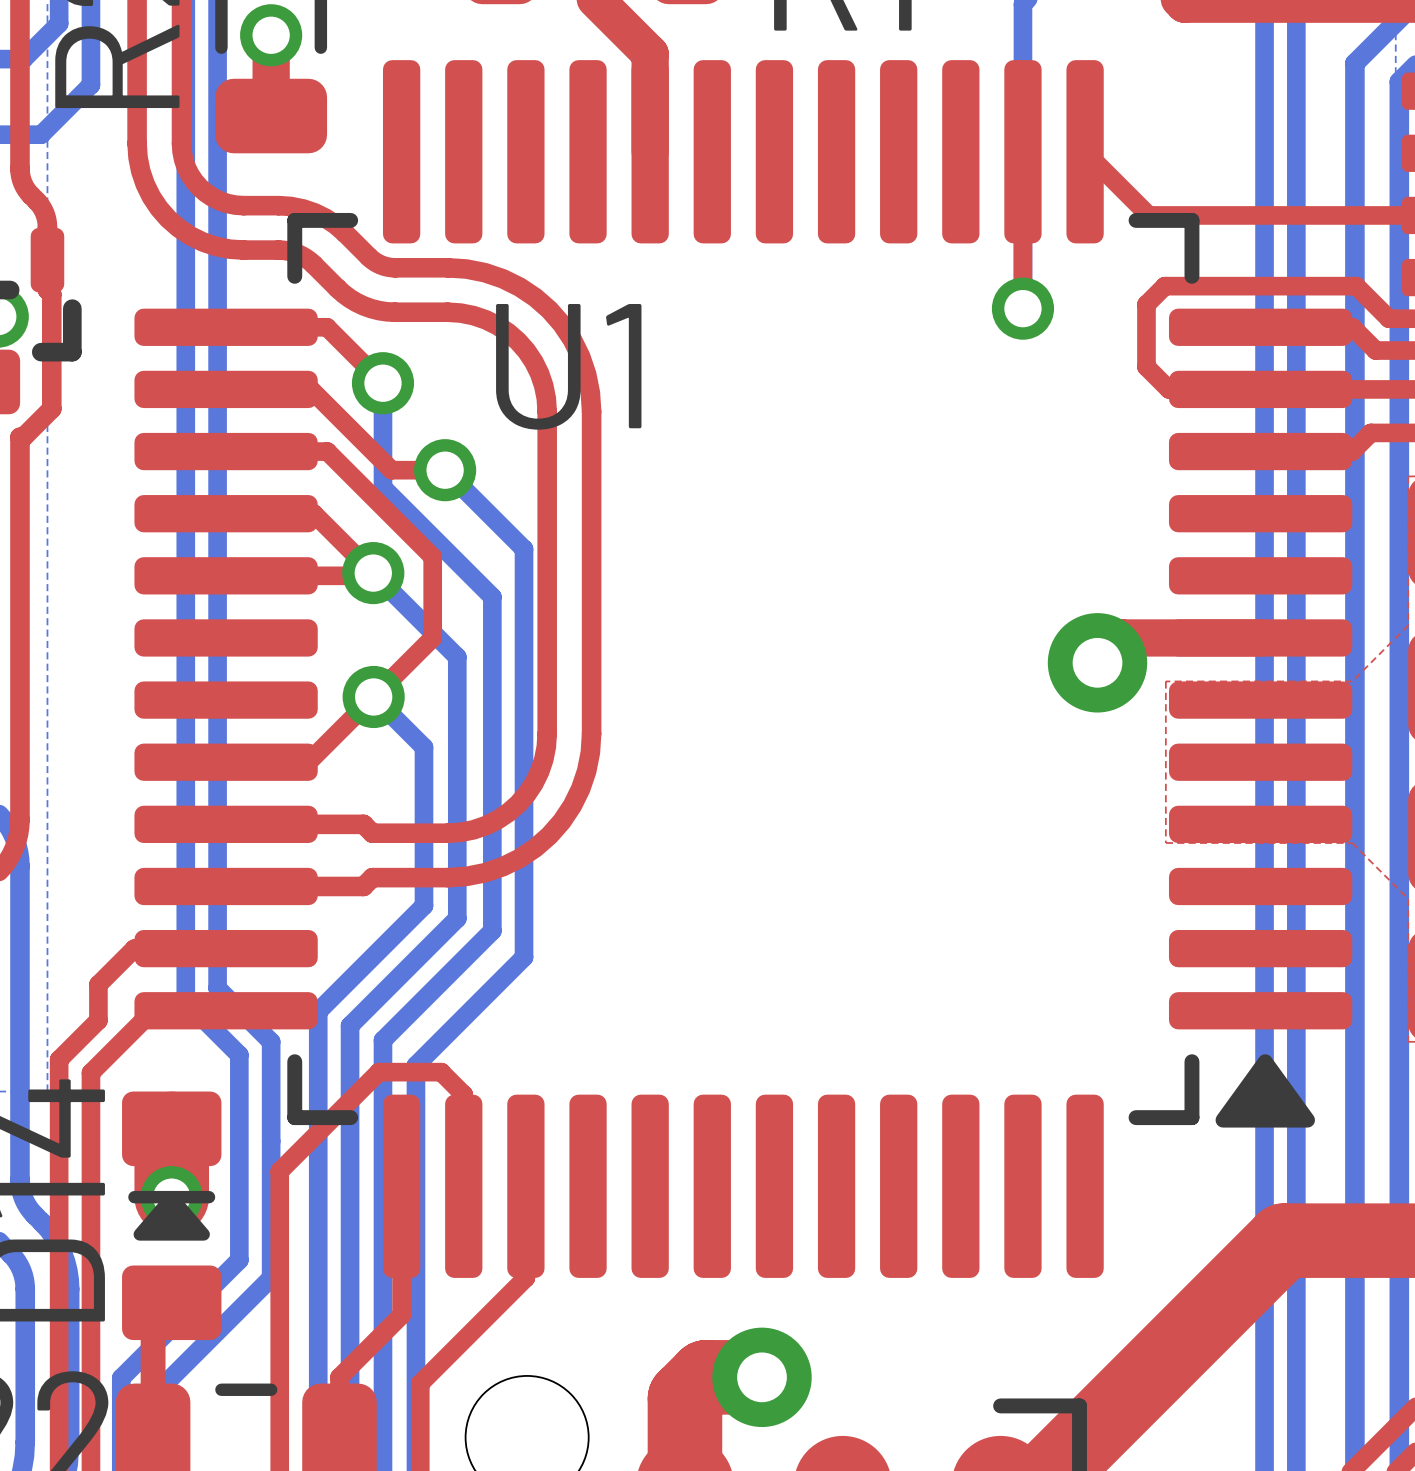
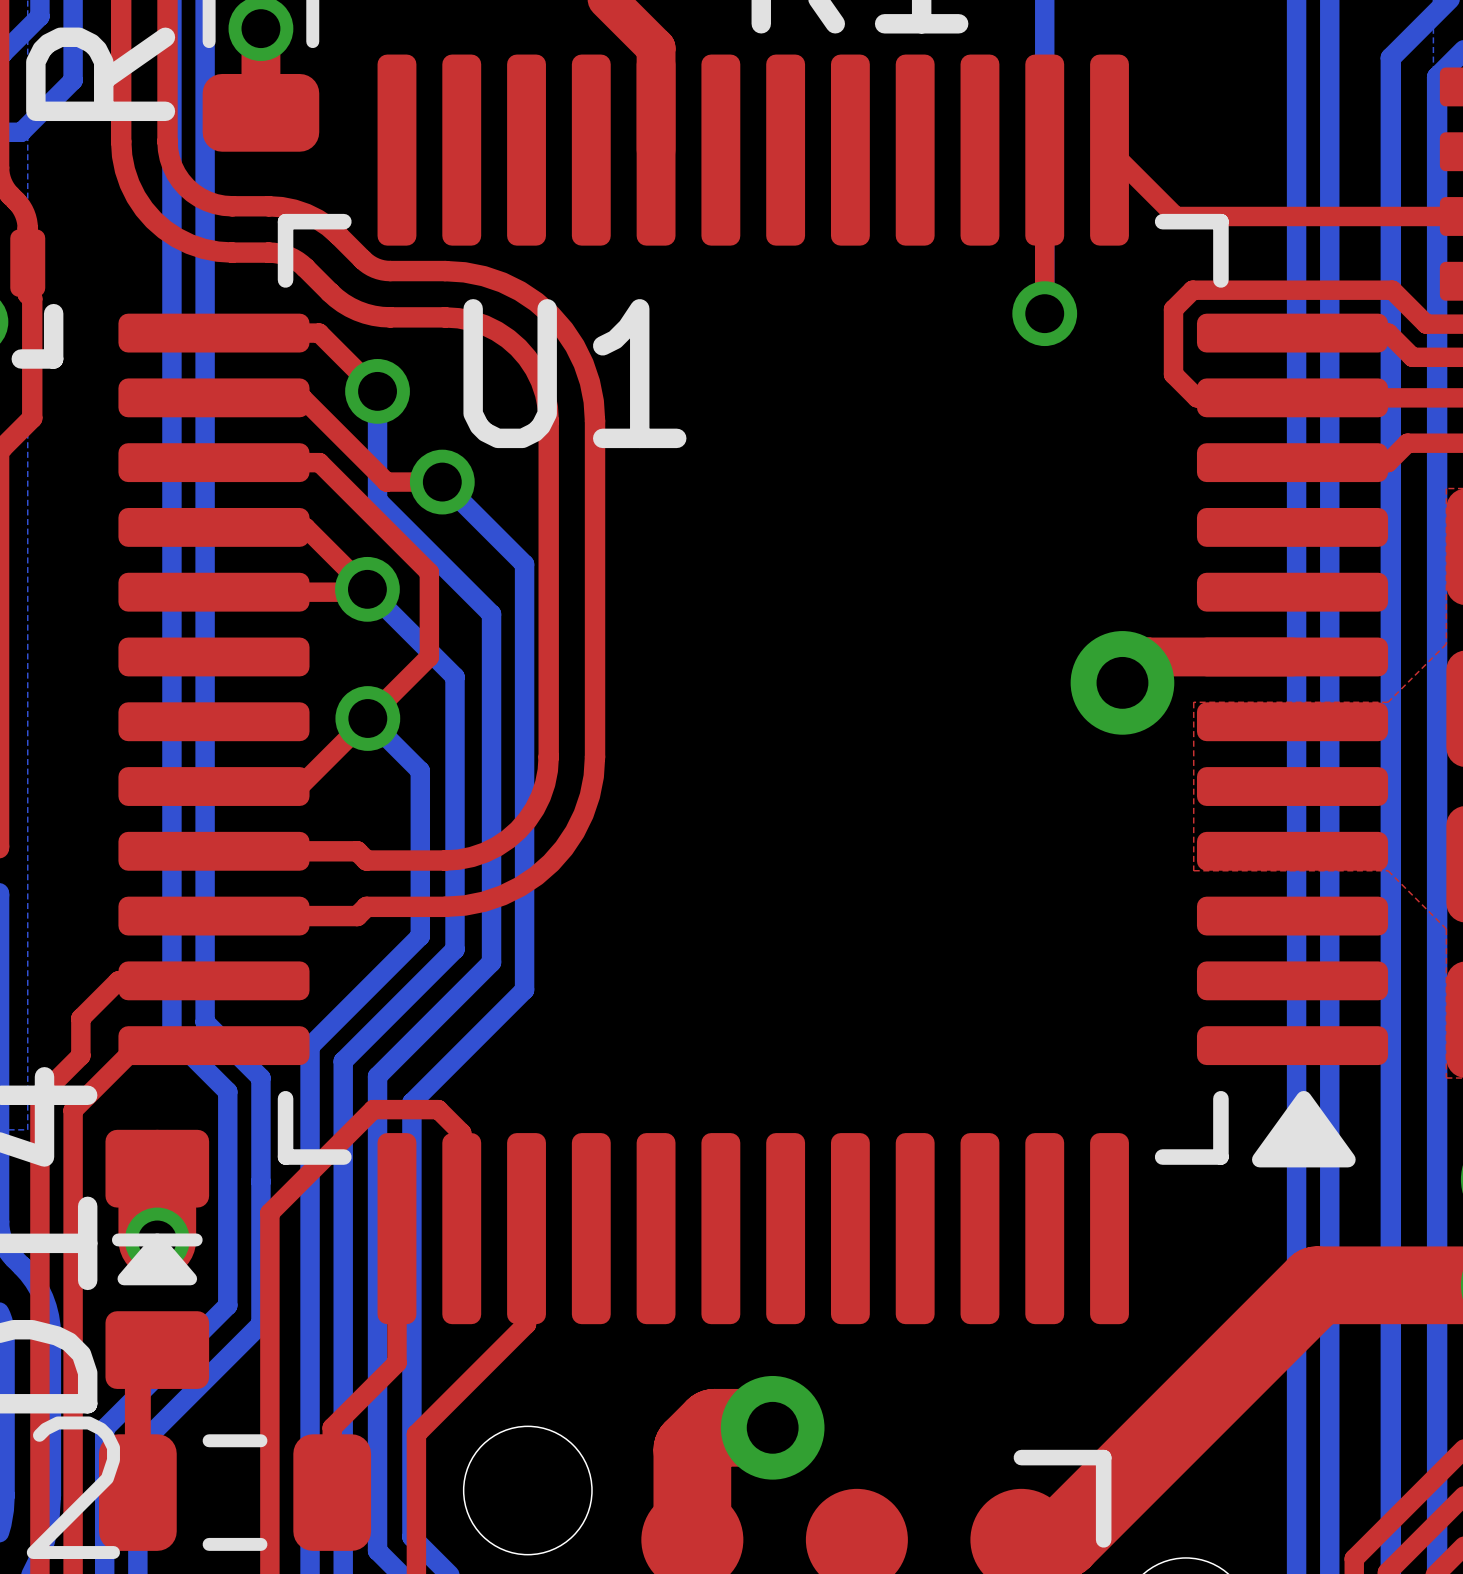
U1 footprint: [134, 60, 1353, 1278] -> [118, 54, 1389, 1325]

